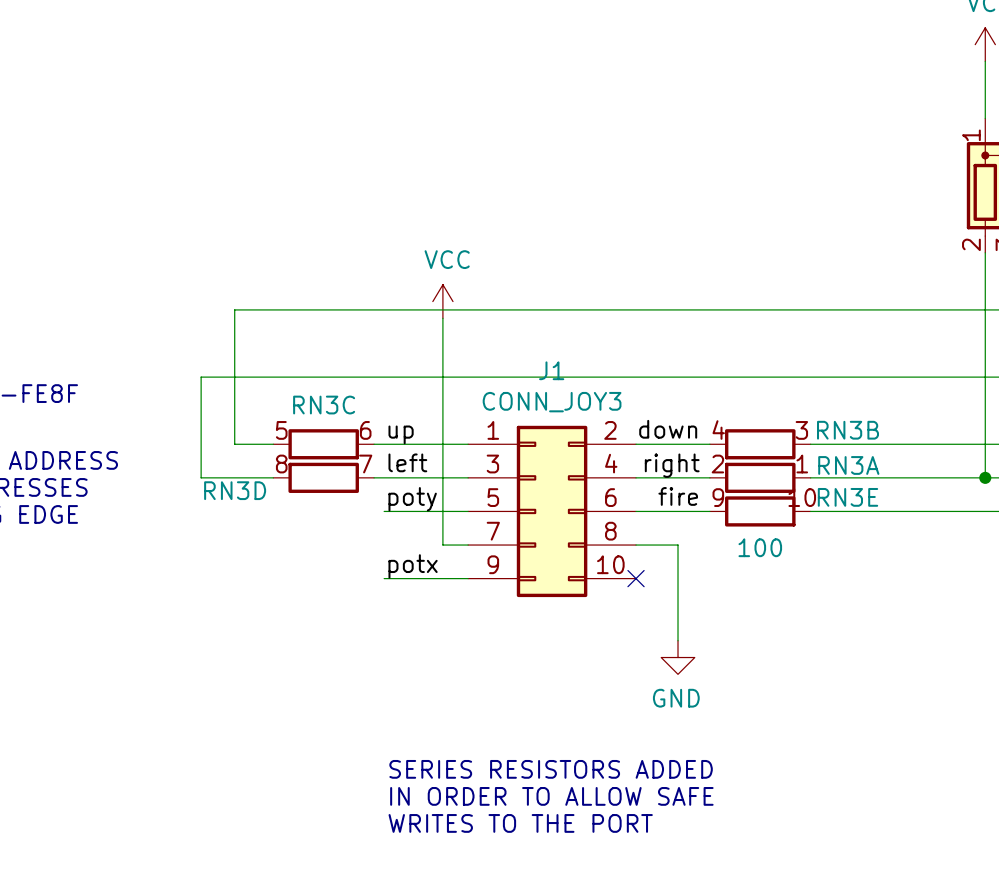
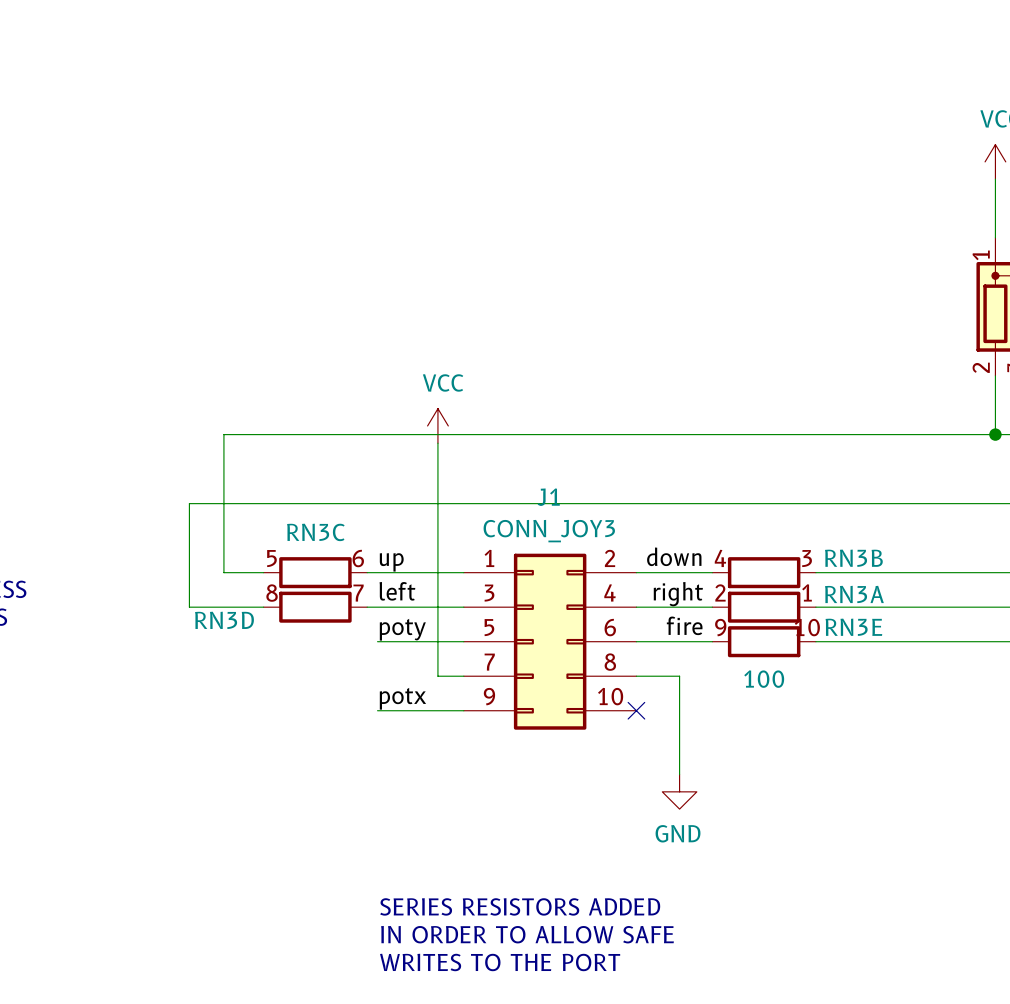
wire: (985, 309) (985, 477) -> none
junction: none -> (995, 434)
junction: (985, 477) -> none

